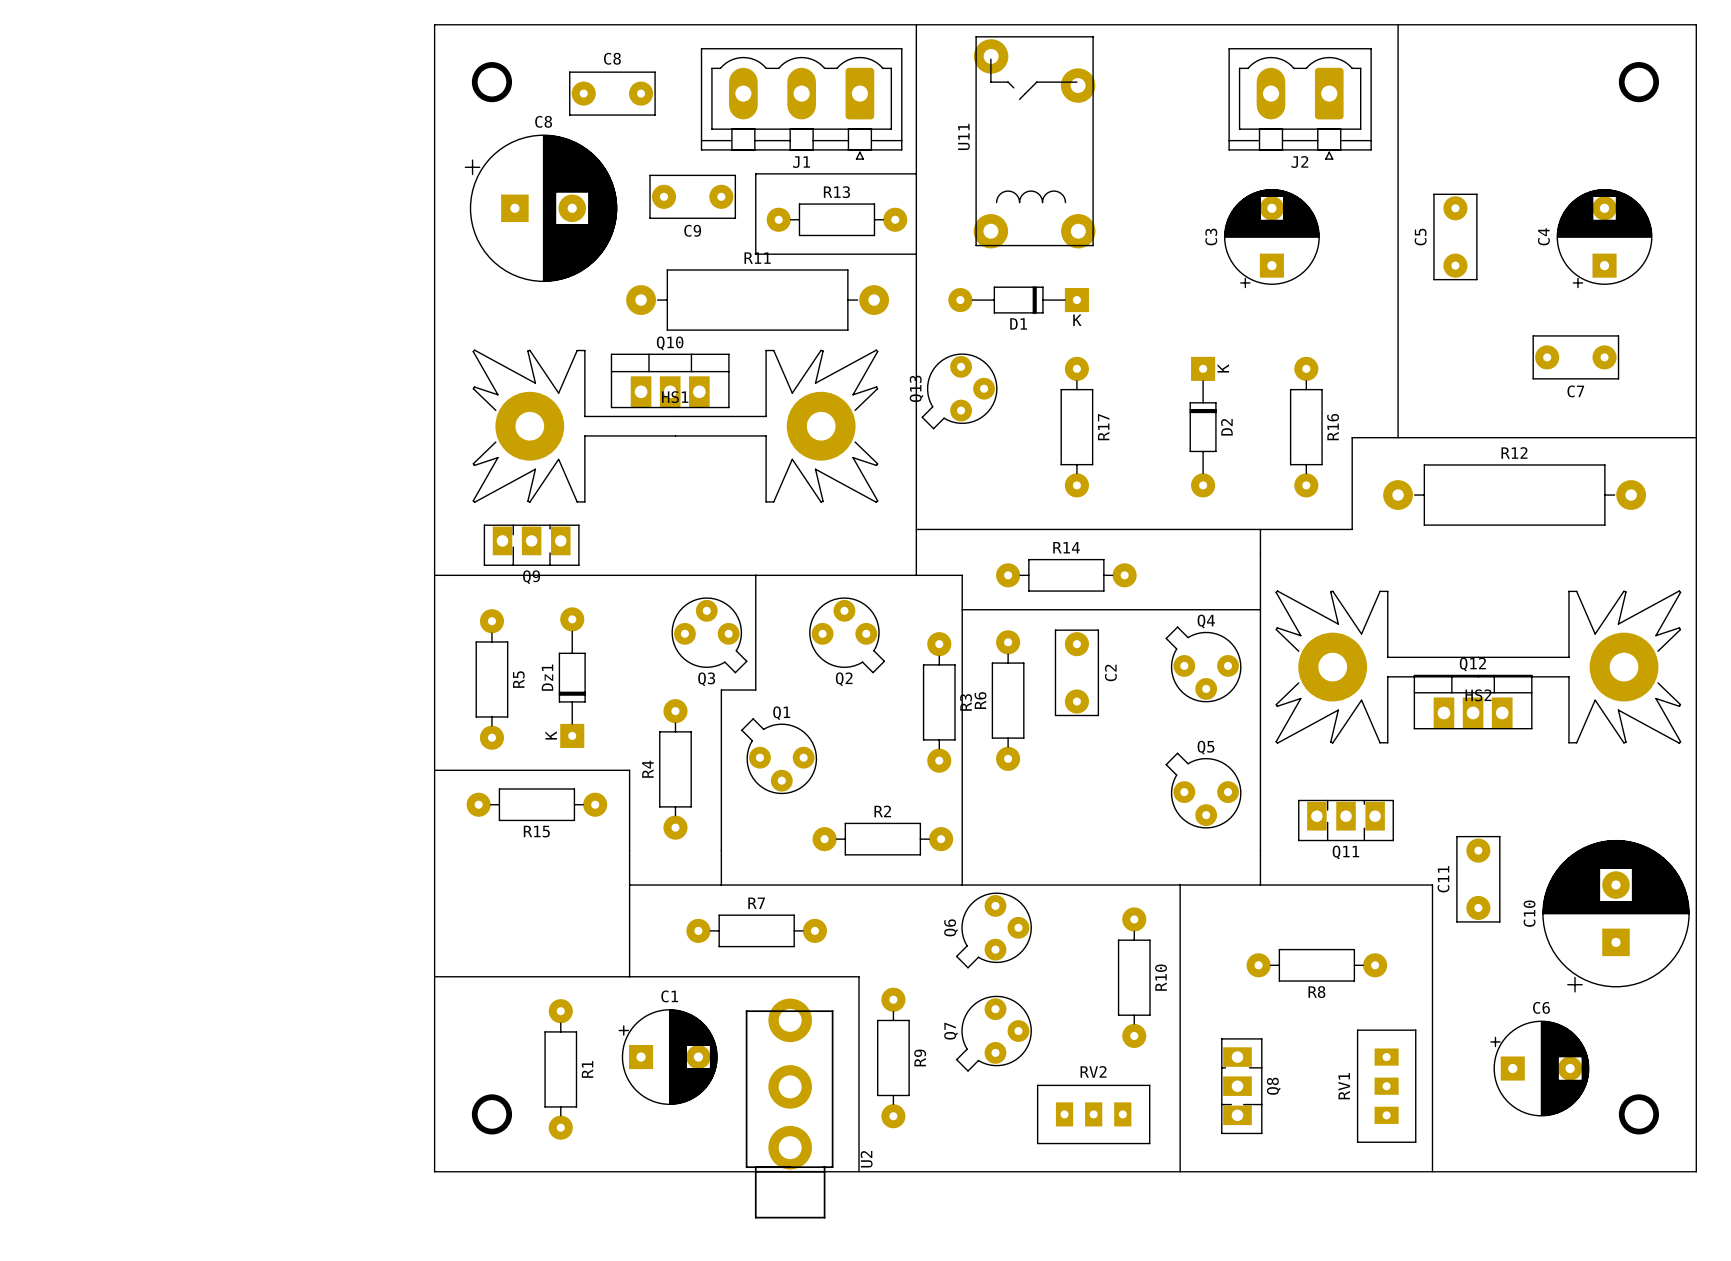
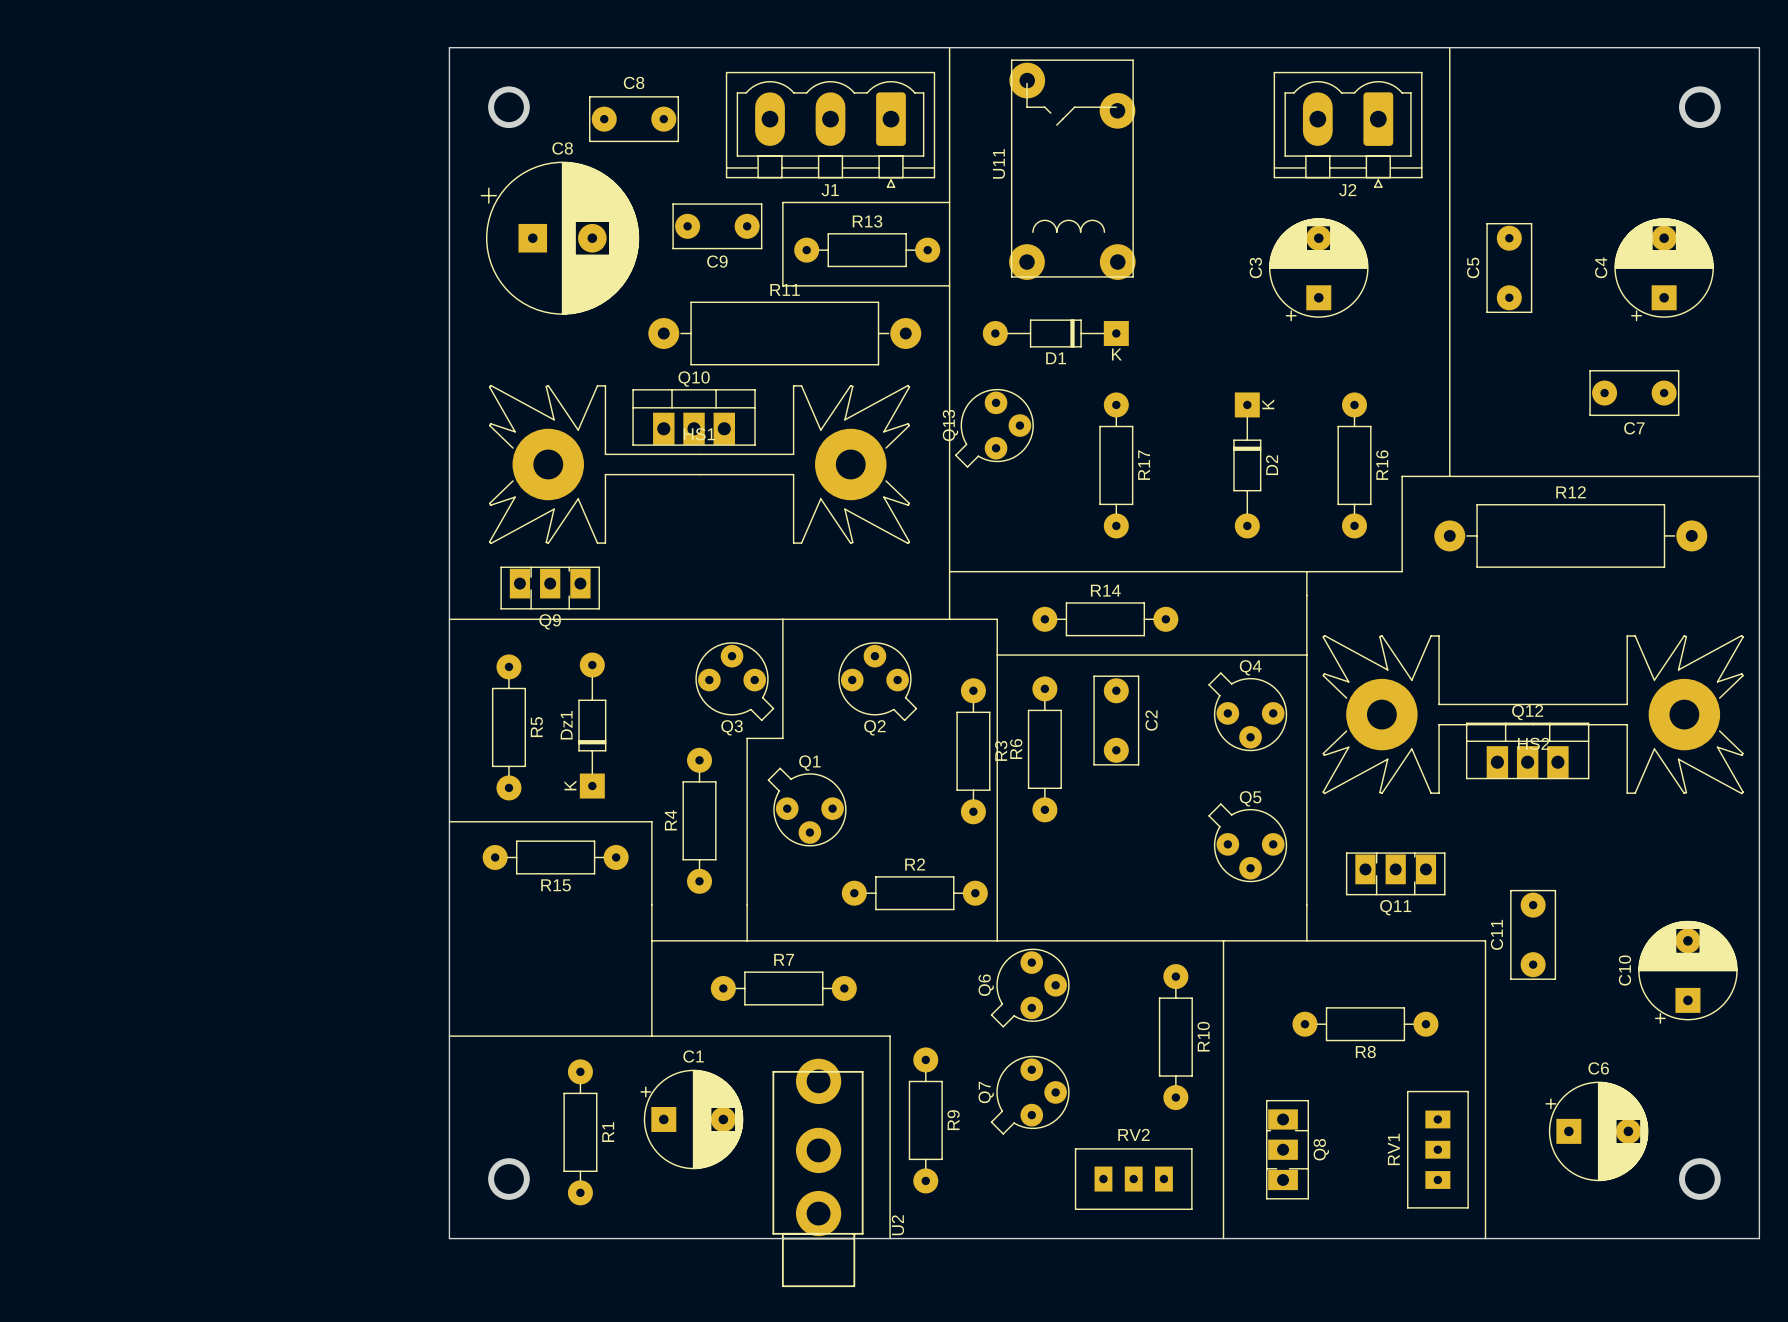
C10 footprint: [1542, 839, 1690, 993] -> [1638, 920, 1738, 1024]
C10 name position: C10 (1529, 913) -> C10 (1624, 970)

